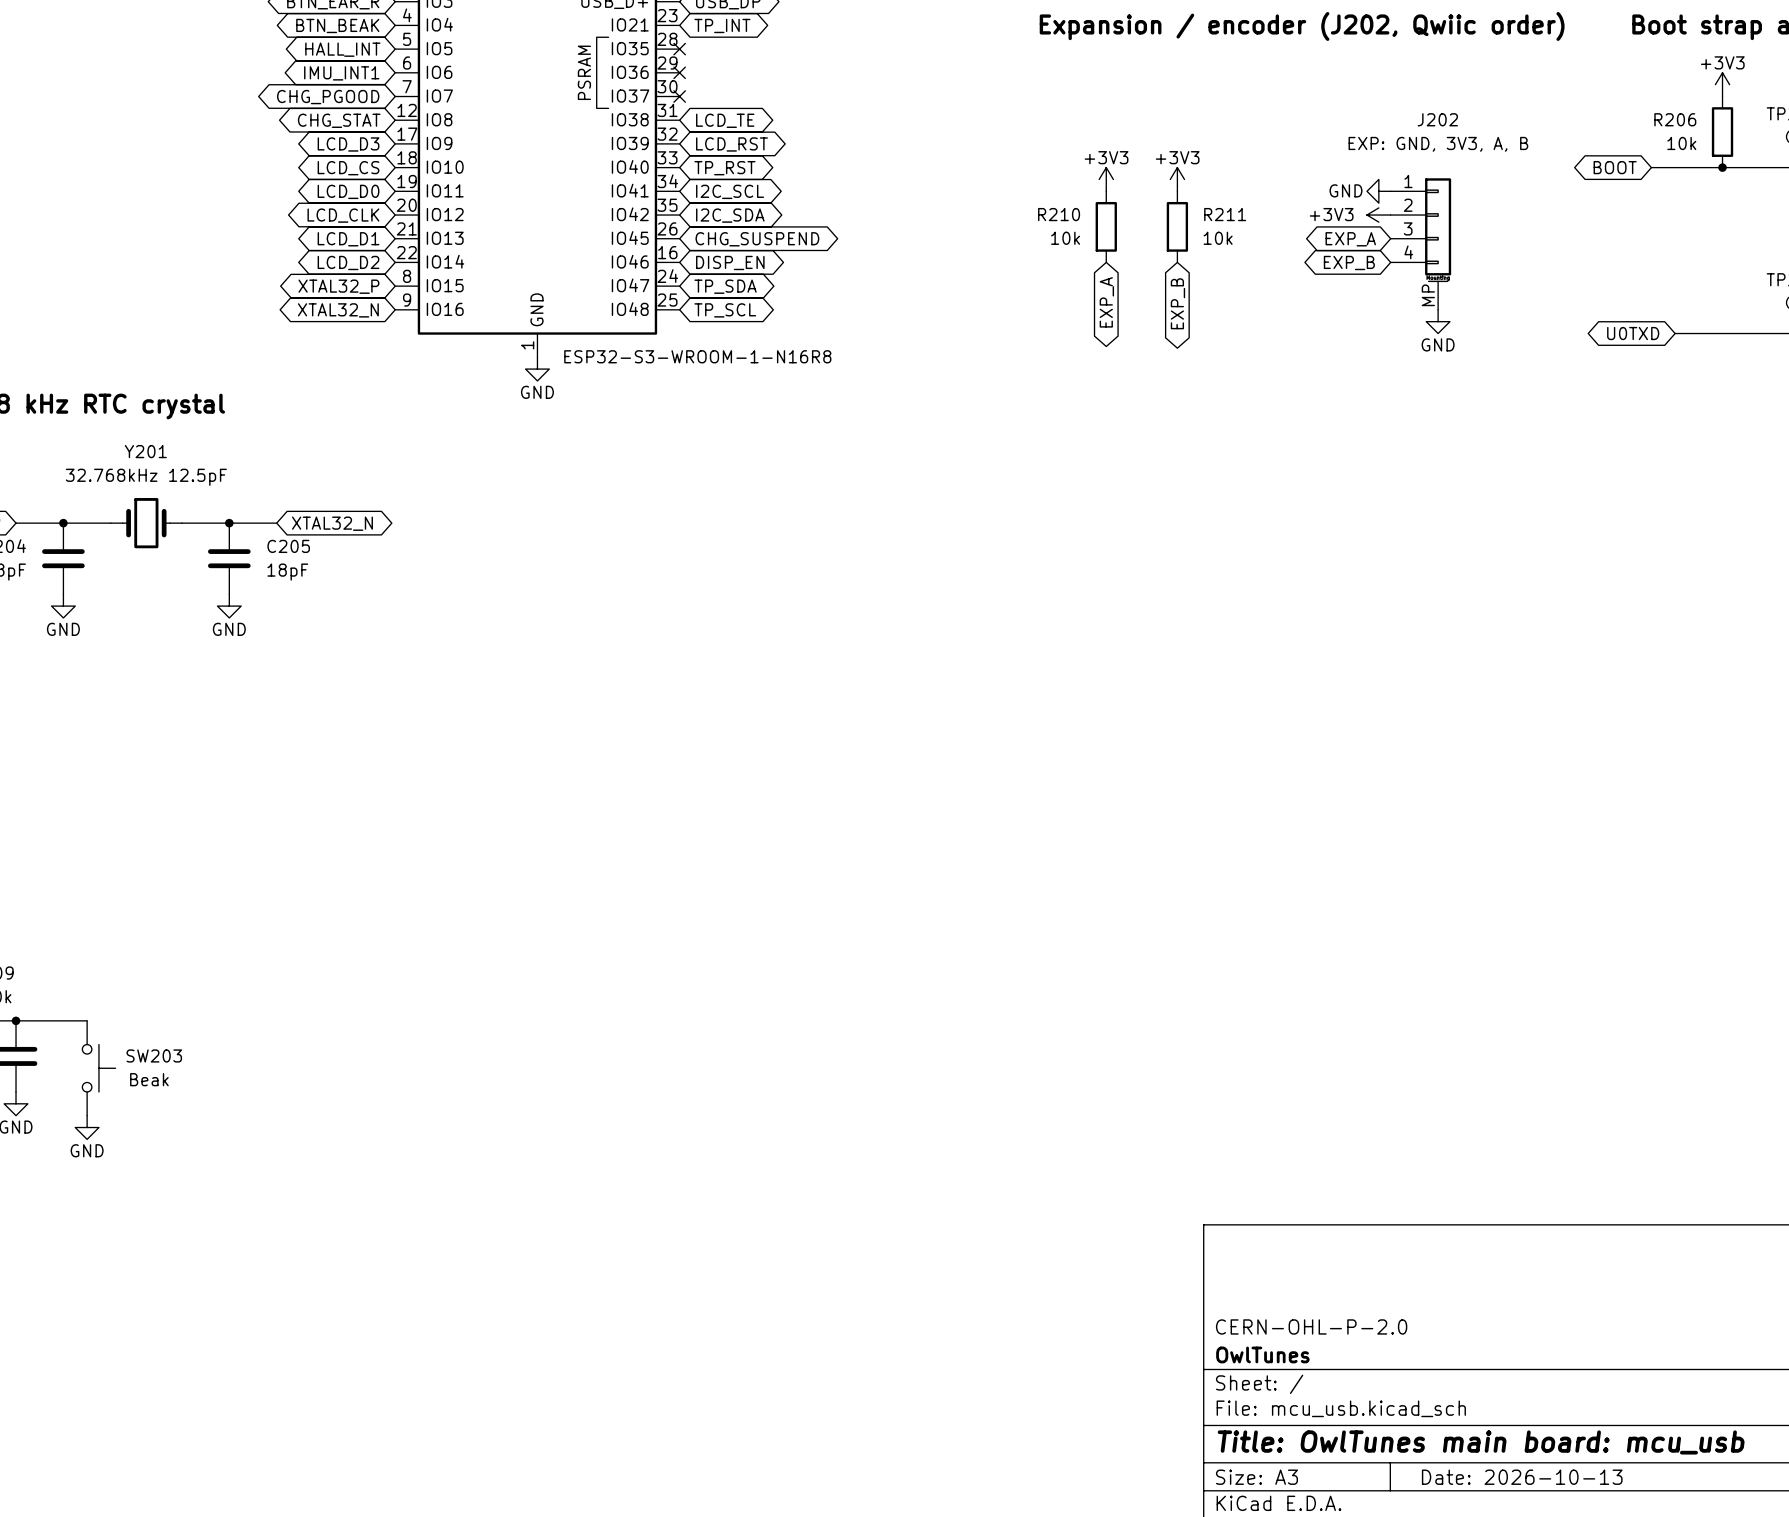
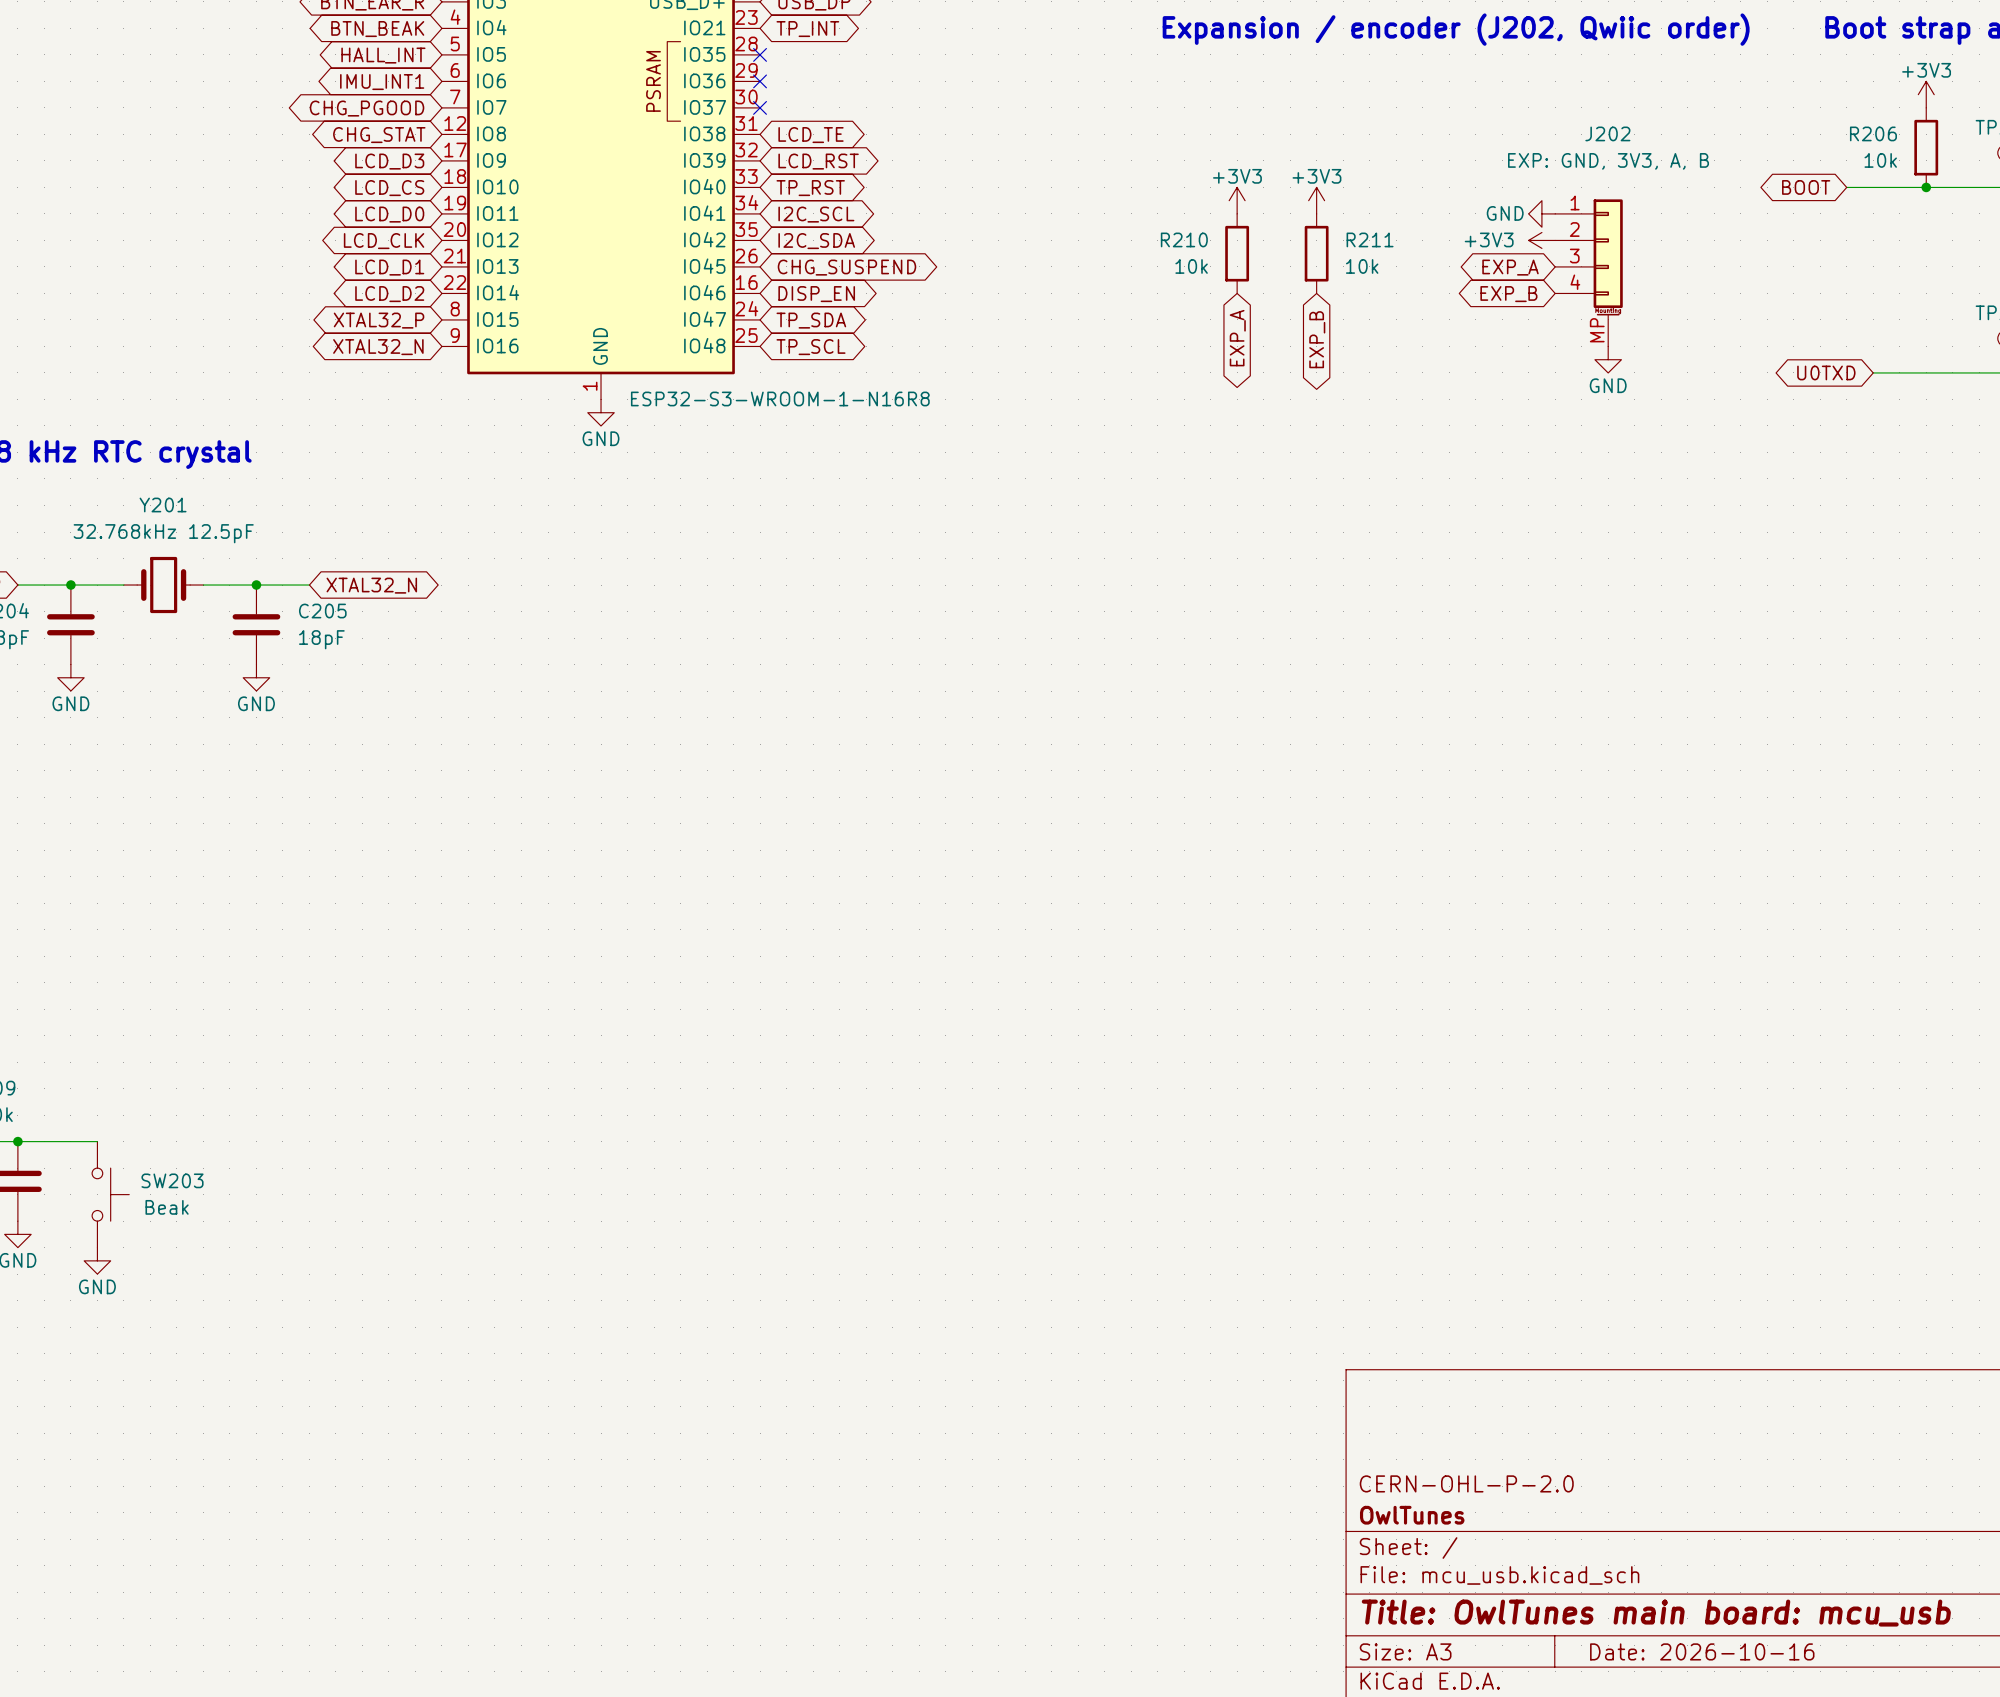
title block: Date: 2026-10-13 (1522, 1477) -> Date: 2026-10-16 (1702, 1651)

